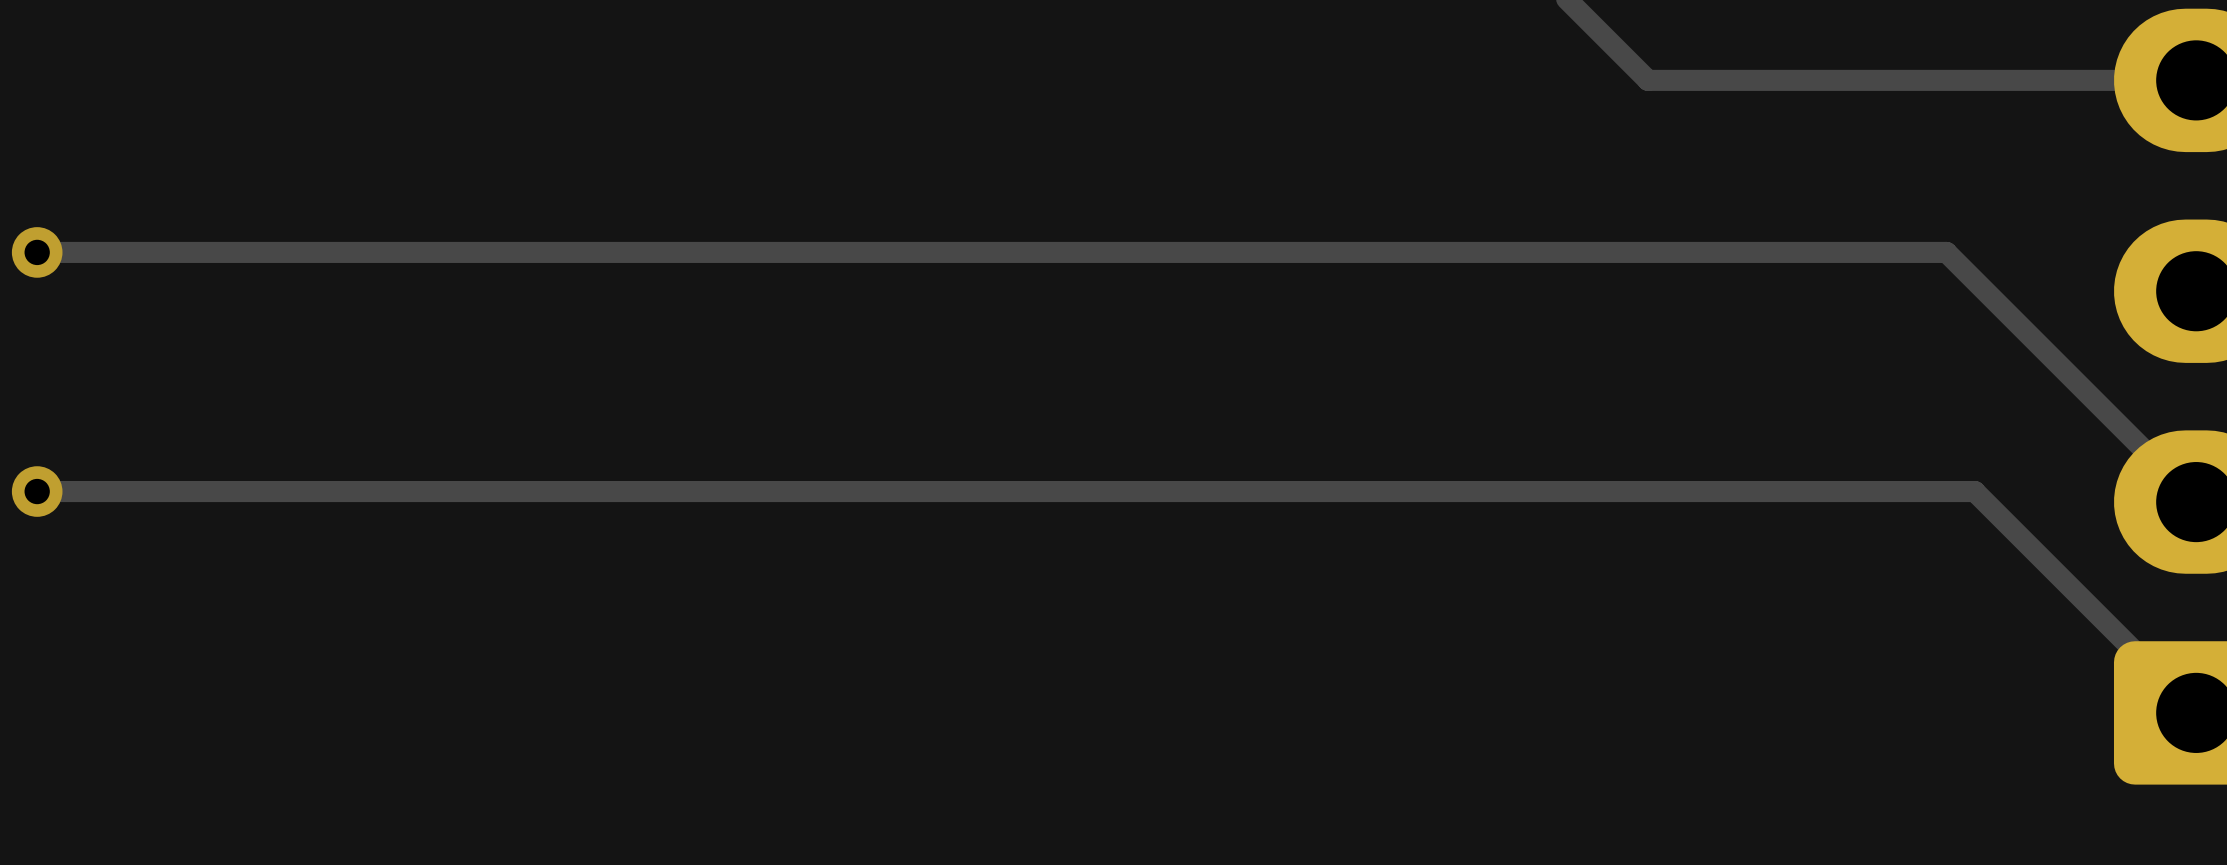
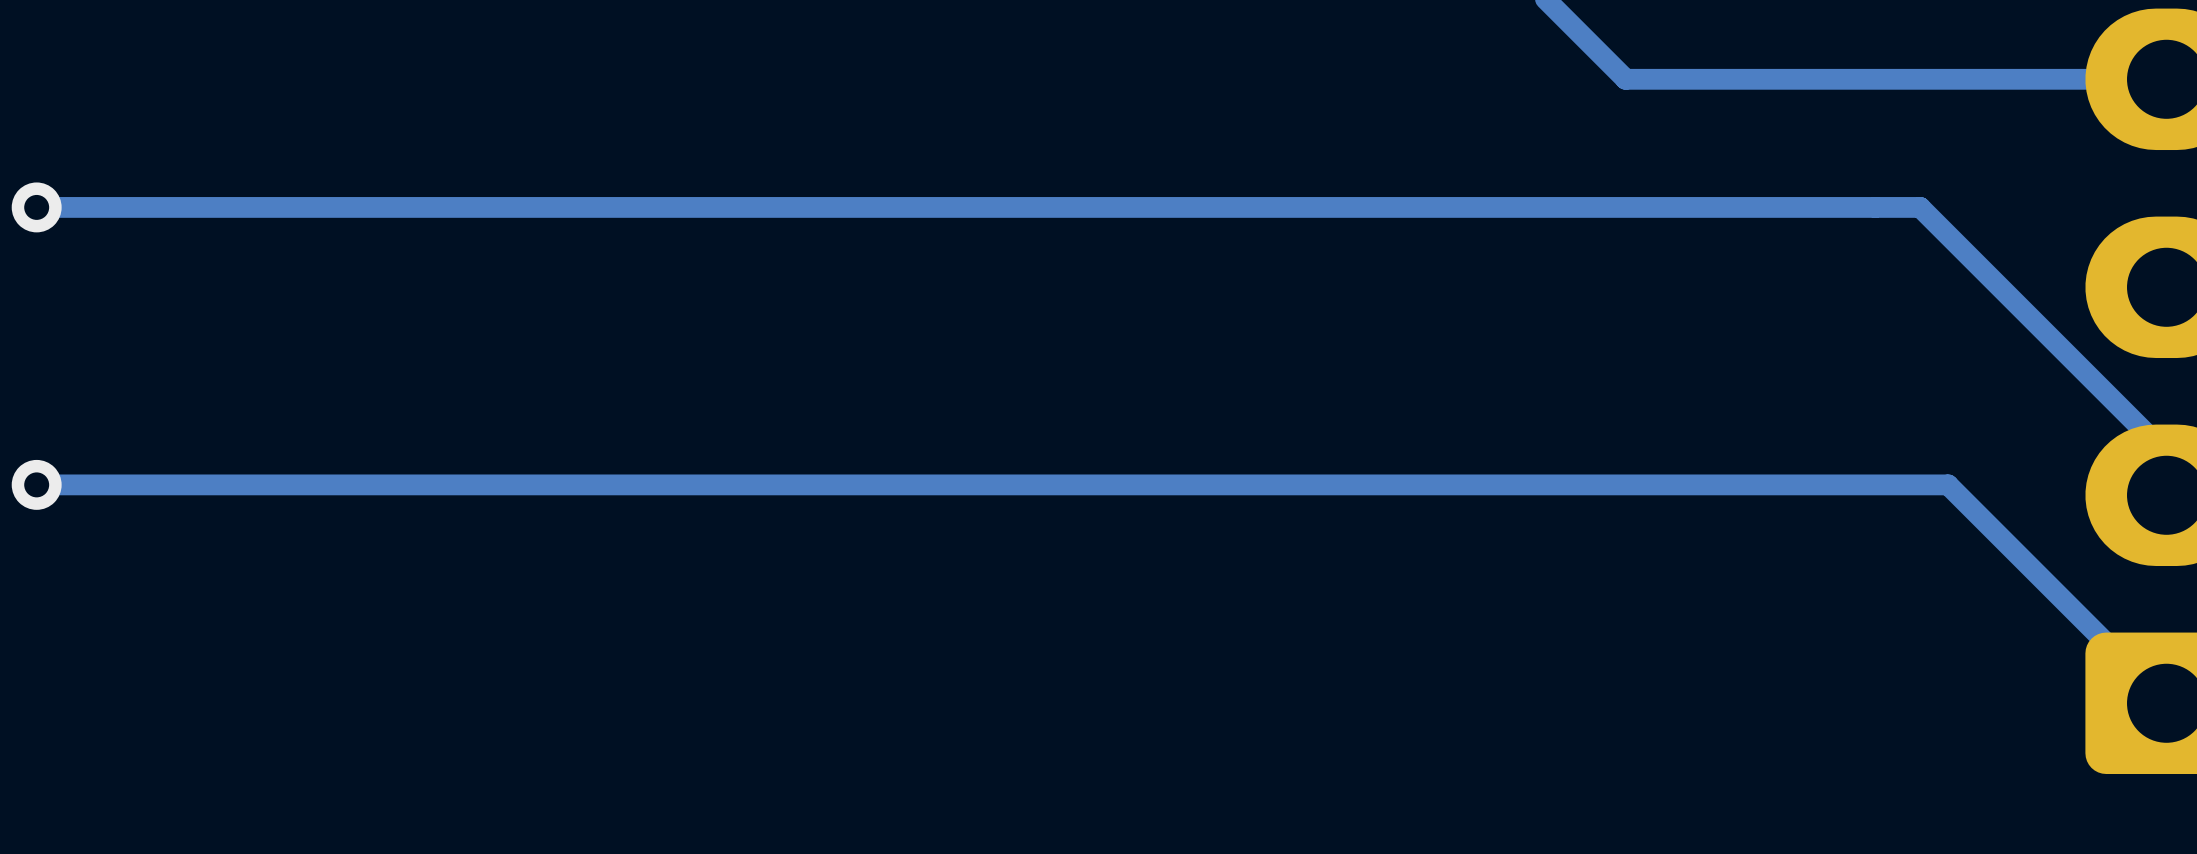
track: (37, 252) (1946, 252) (2196, 502) -> (36, 207) (1920, 207) (2166, 453) (2166, 495)
via position: (37, 252) -> (36, 207)

